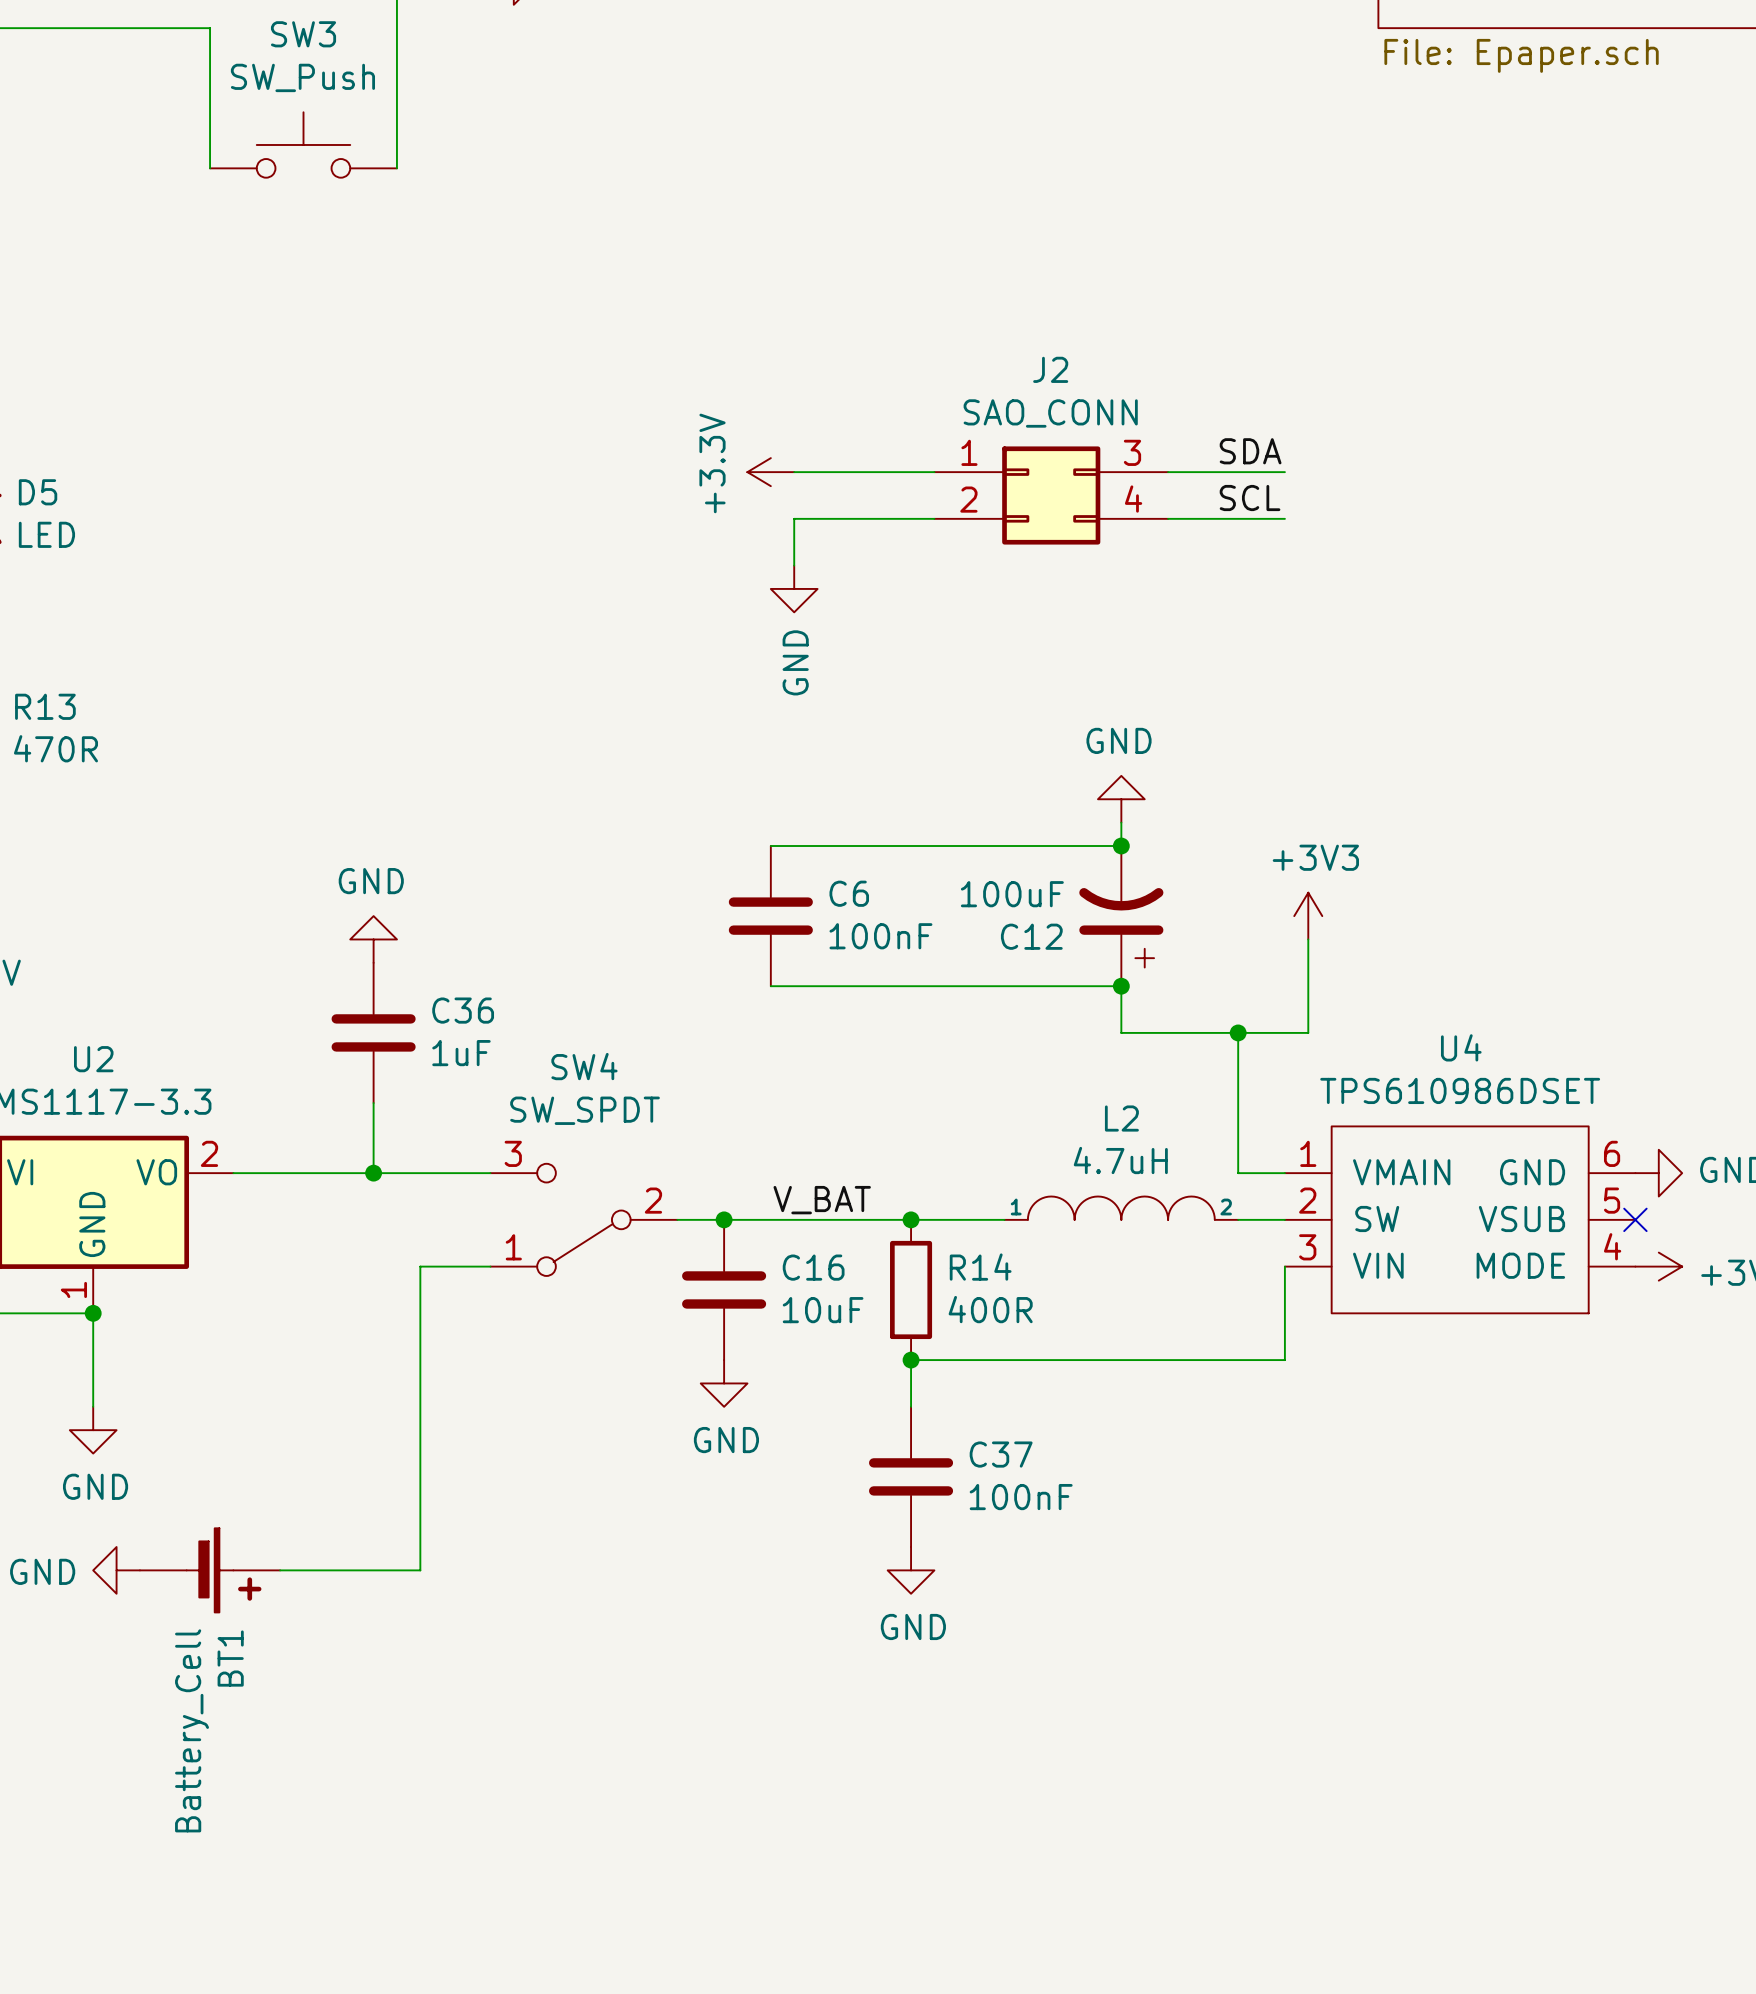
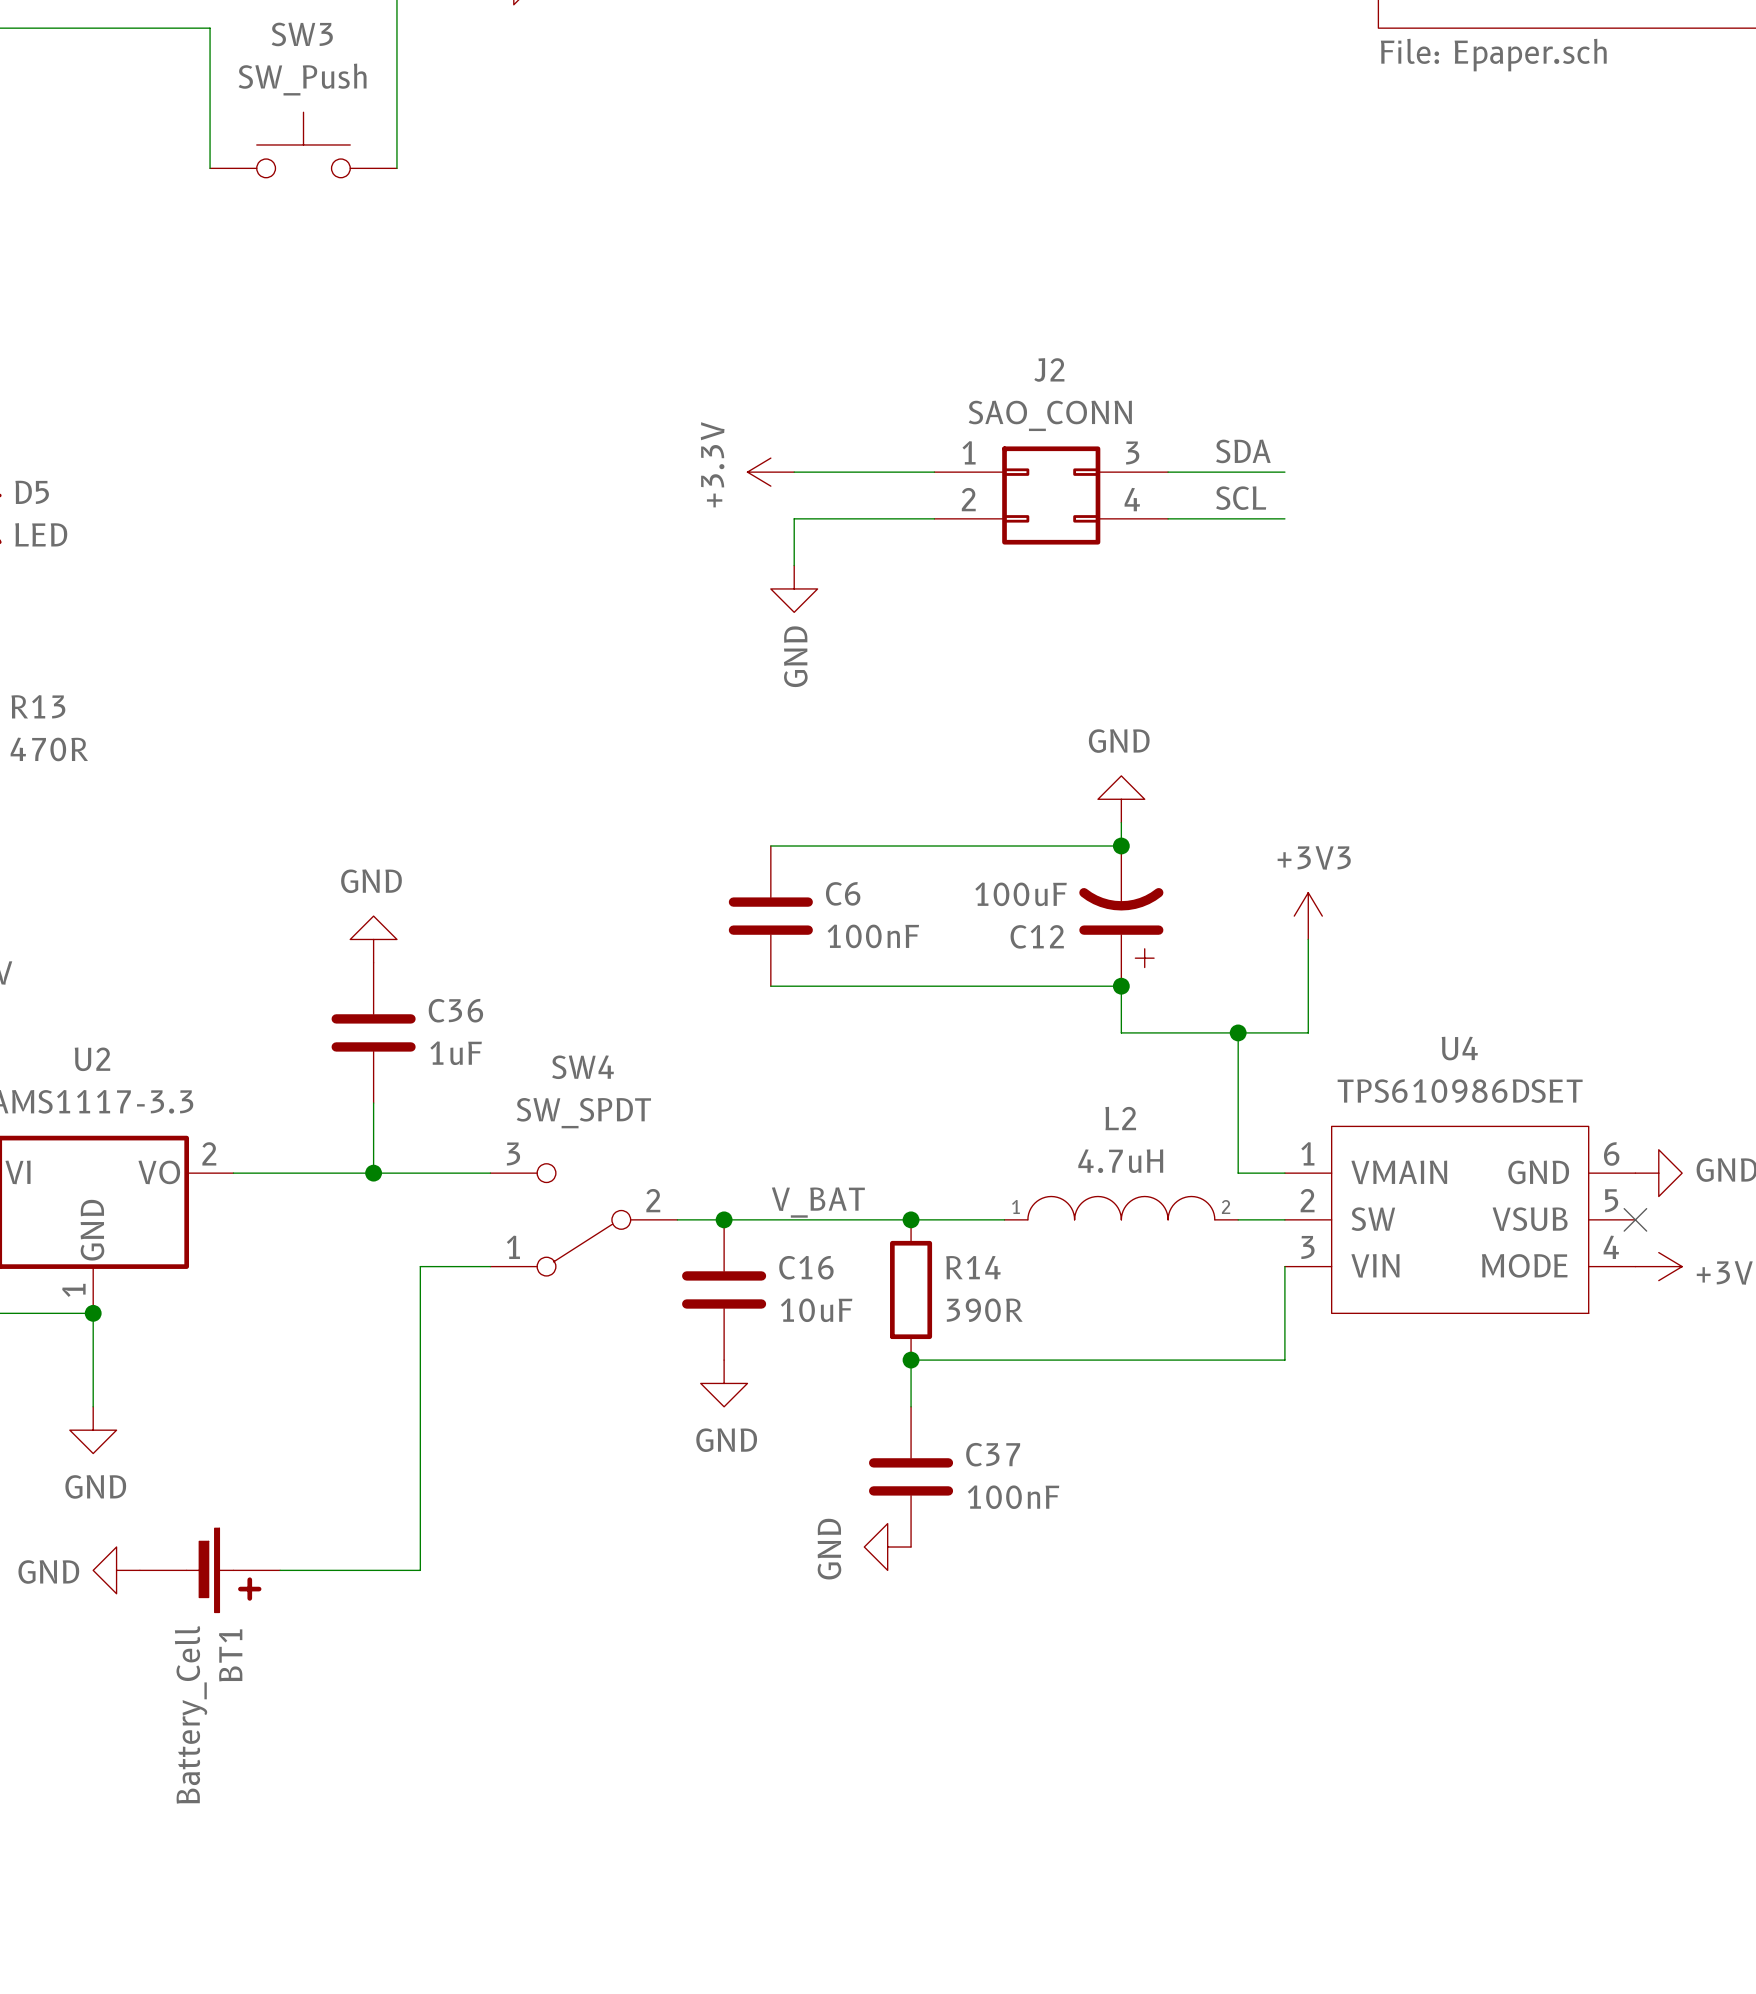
R14 value: 400R (990, 1309) -> 390R (984, 1310)
power symbol rotation: 0° (911, 1570) -> 90° clockwise (887, 1547)
power symbol position: GND (911, 1570) -> GND (887, 1547)

